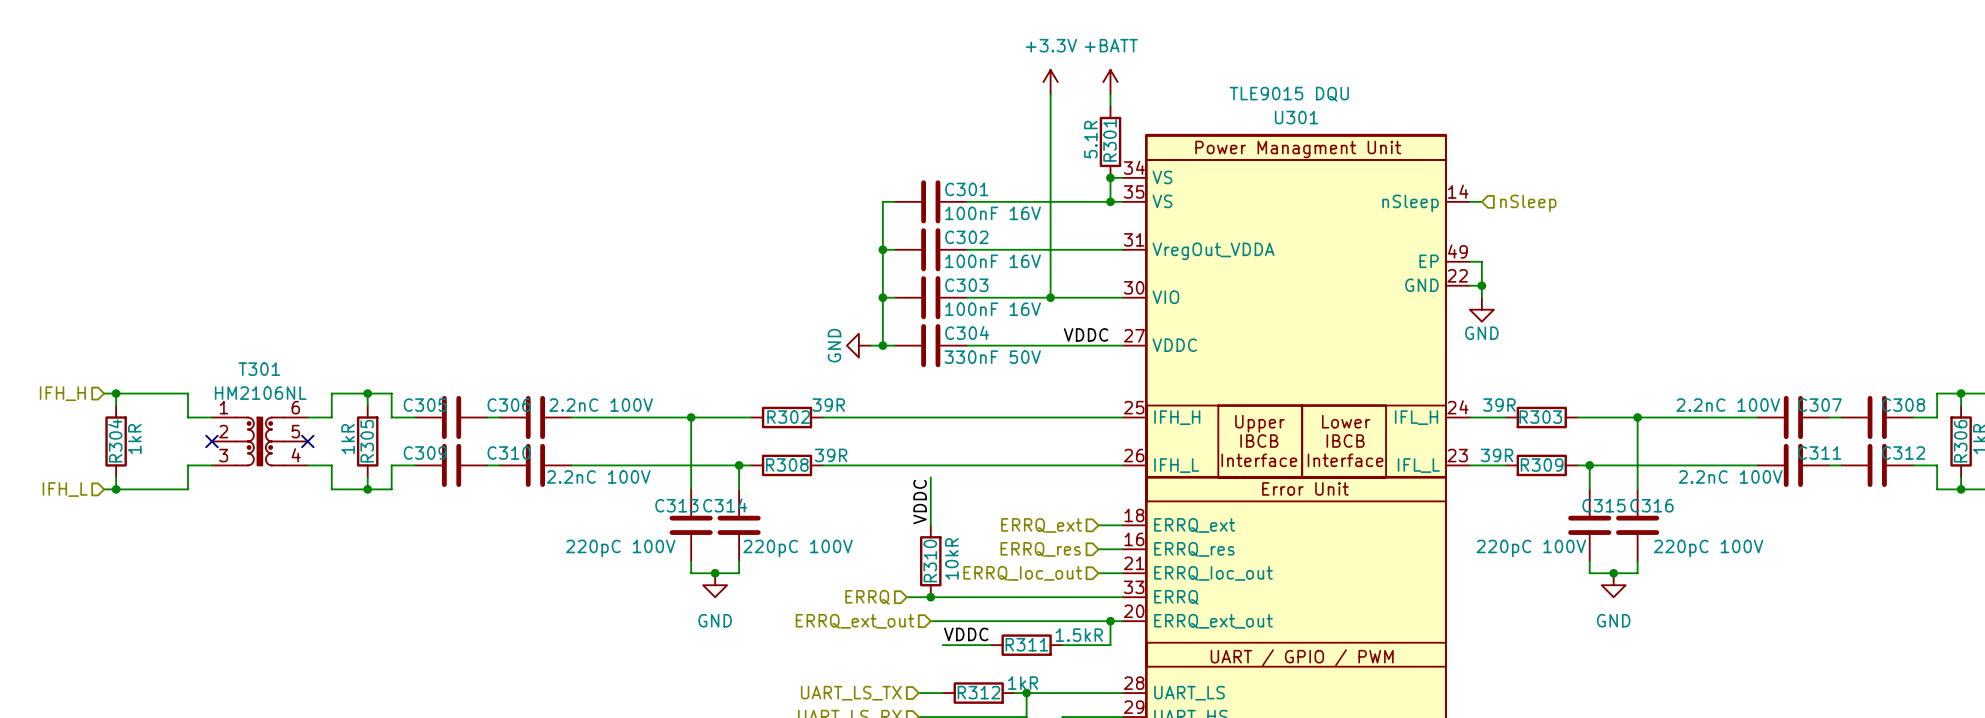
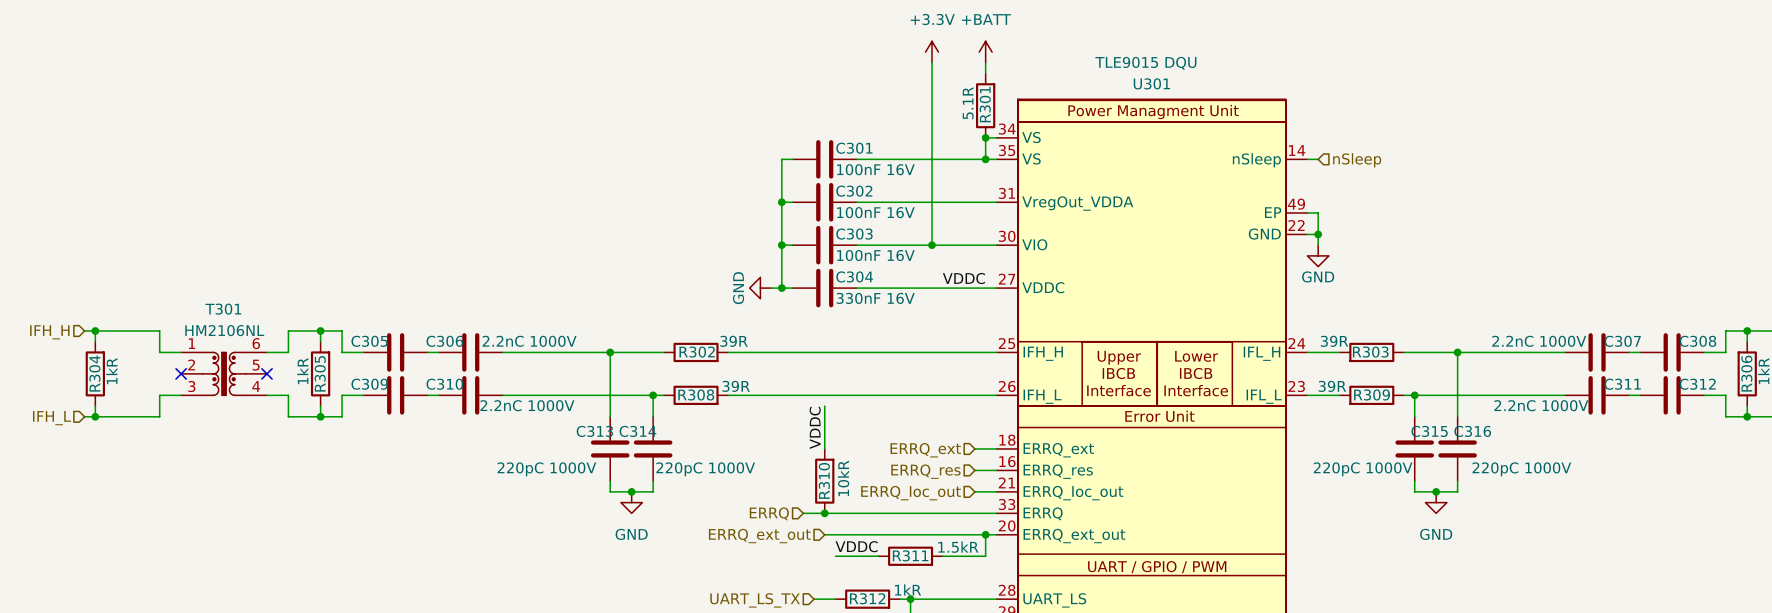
C304 value: 330nF 50V (992, 357) -> 330nF 16V (875, 298)
C306 value: 2.2nC 100V (601, 405) -> 2.2nC 1000V (529, 341)
C307 value: 2.2nC 100V (1728, 405) -> 2.2nC 1000V (1539, 341)
C310 value: 2.2nC 100V (598, 476) -> 2.2nC 1000V (527, 405)
C311 value: 2.2nC 100V (1730, 476) -> 2.2nC 1000V (1541, 405)
C313 value: 220pC 100V (620, 548) -> 220pC 1000V (546, 469)
C314 value: 220pC 100V (798, 548) -> 220pC 1000V (705, 469)
C315 value: 220pC 100V (1531, 548) -> 220pC 1000V (1363, 469)
C316 value: 220pC 100V (1708, 548) -> 220pC 1000V (1521, 469)

